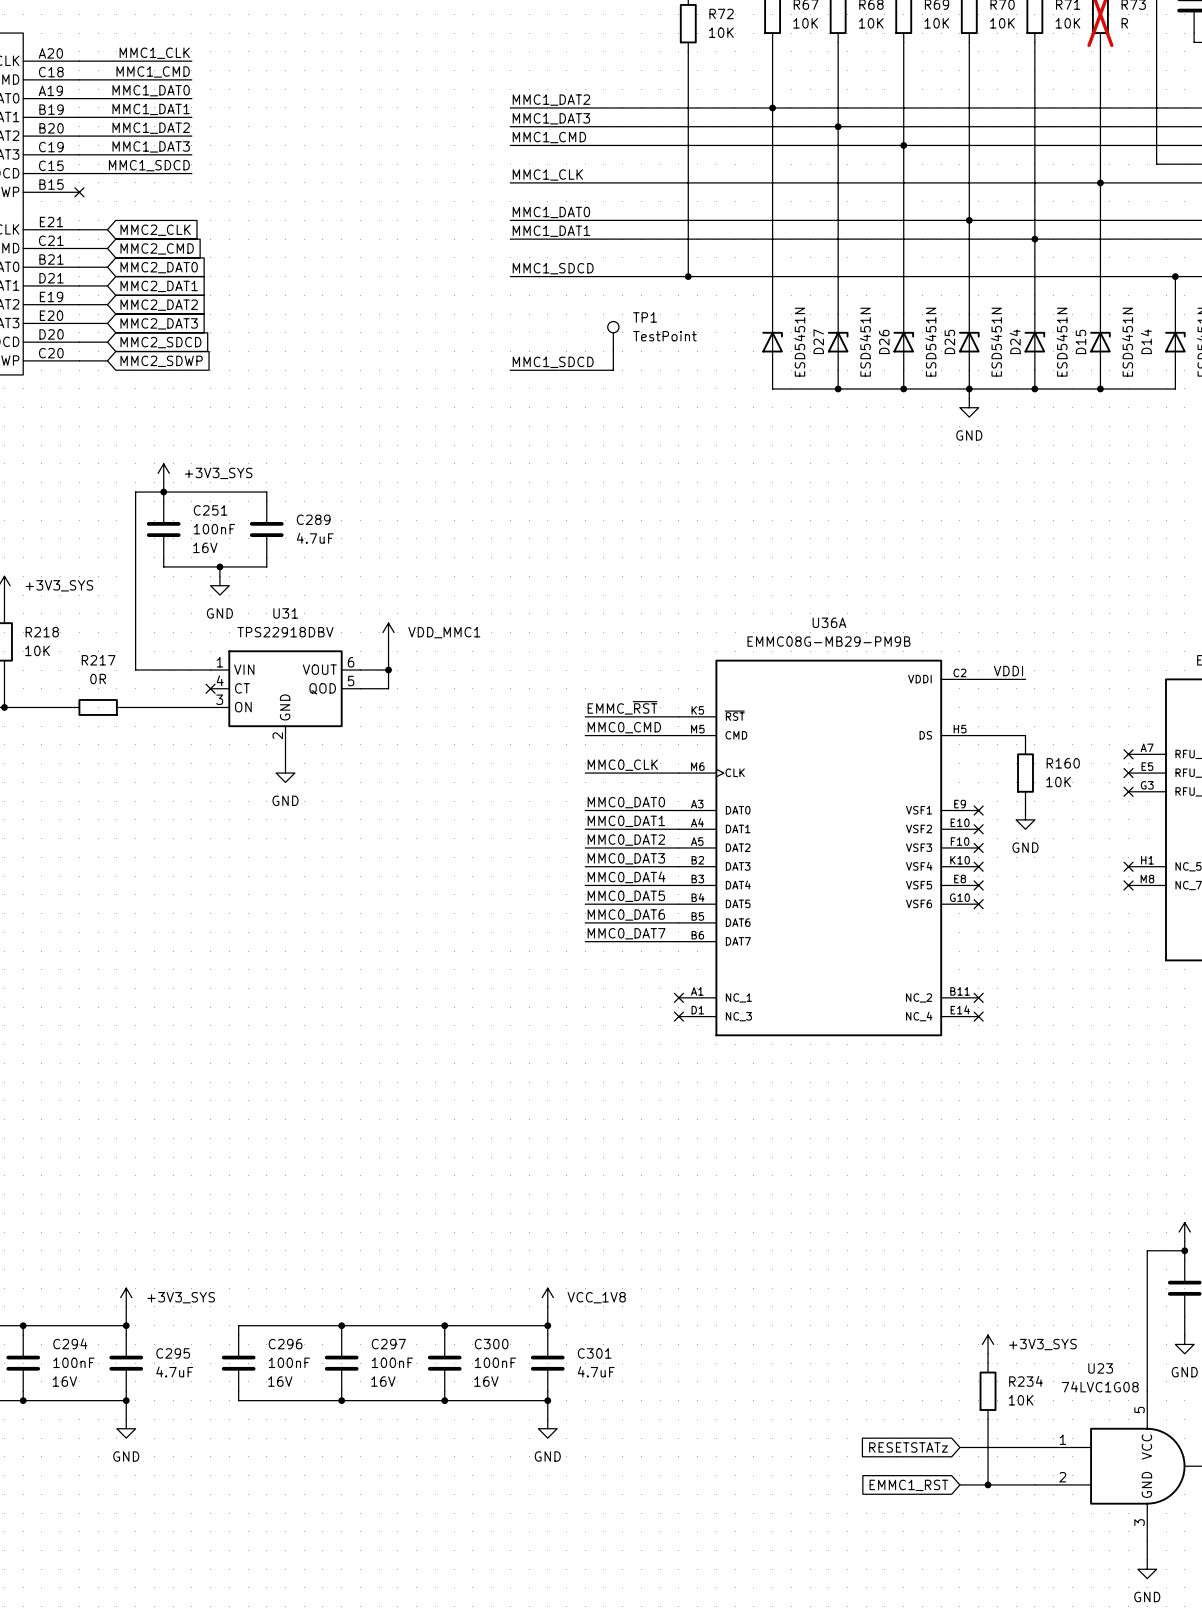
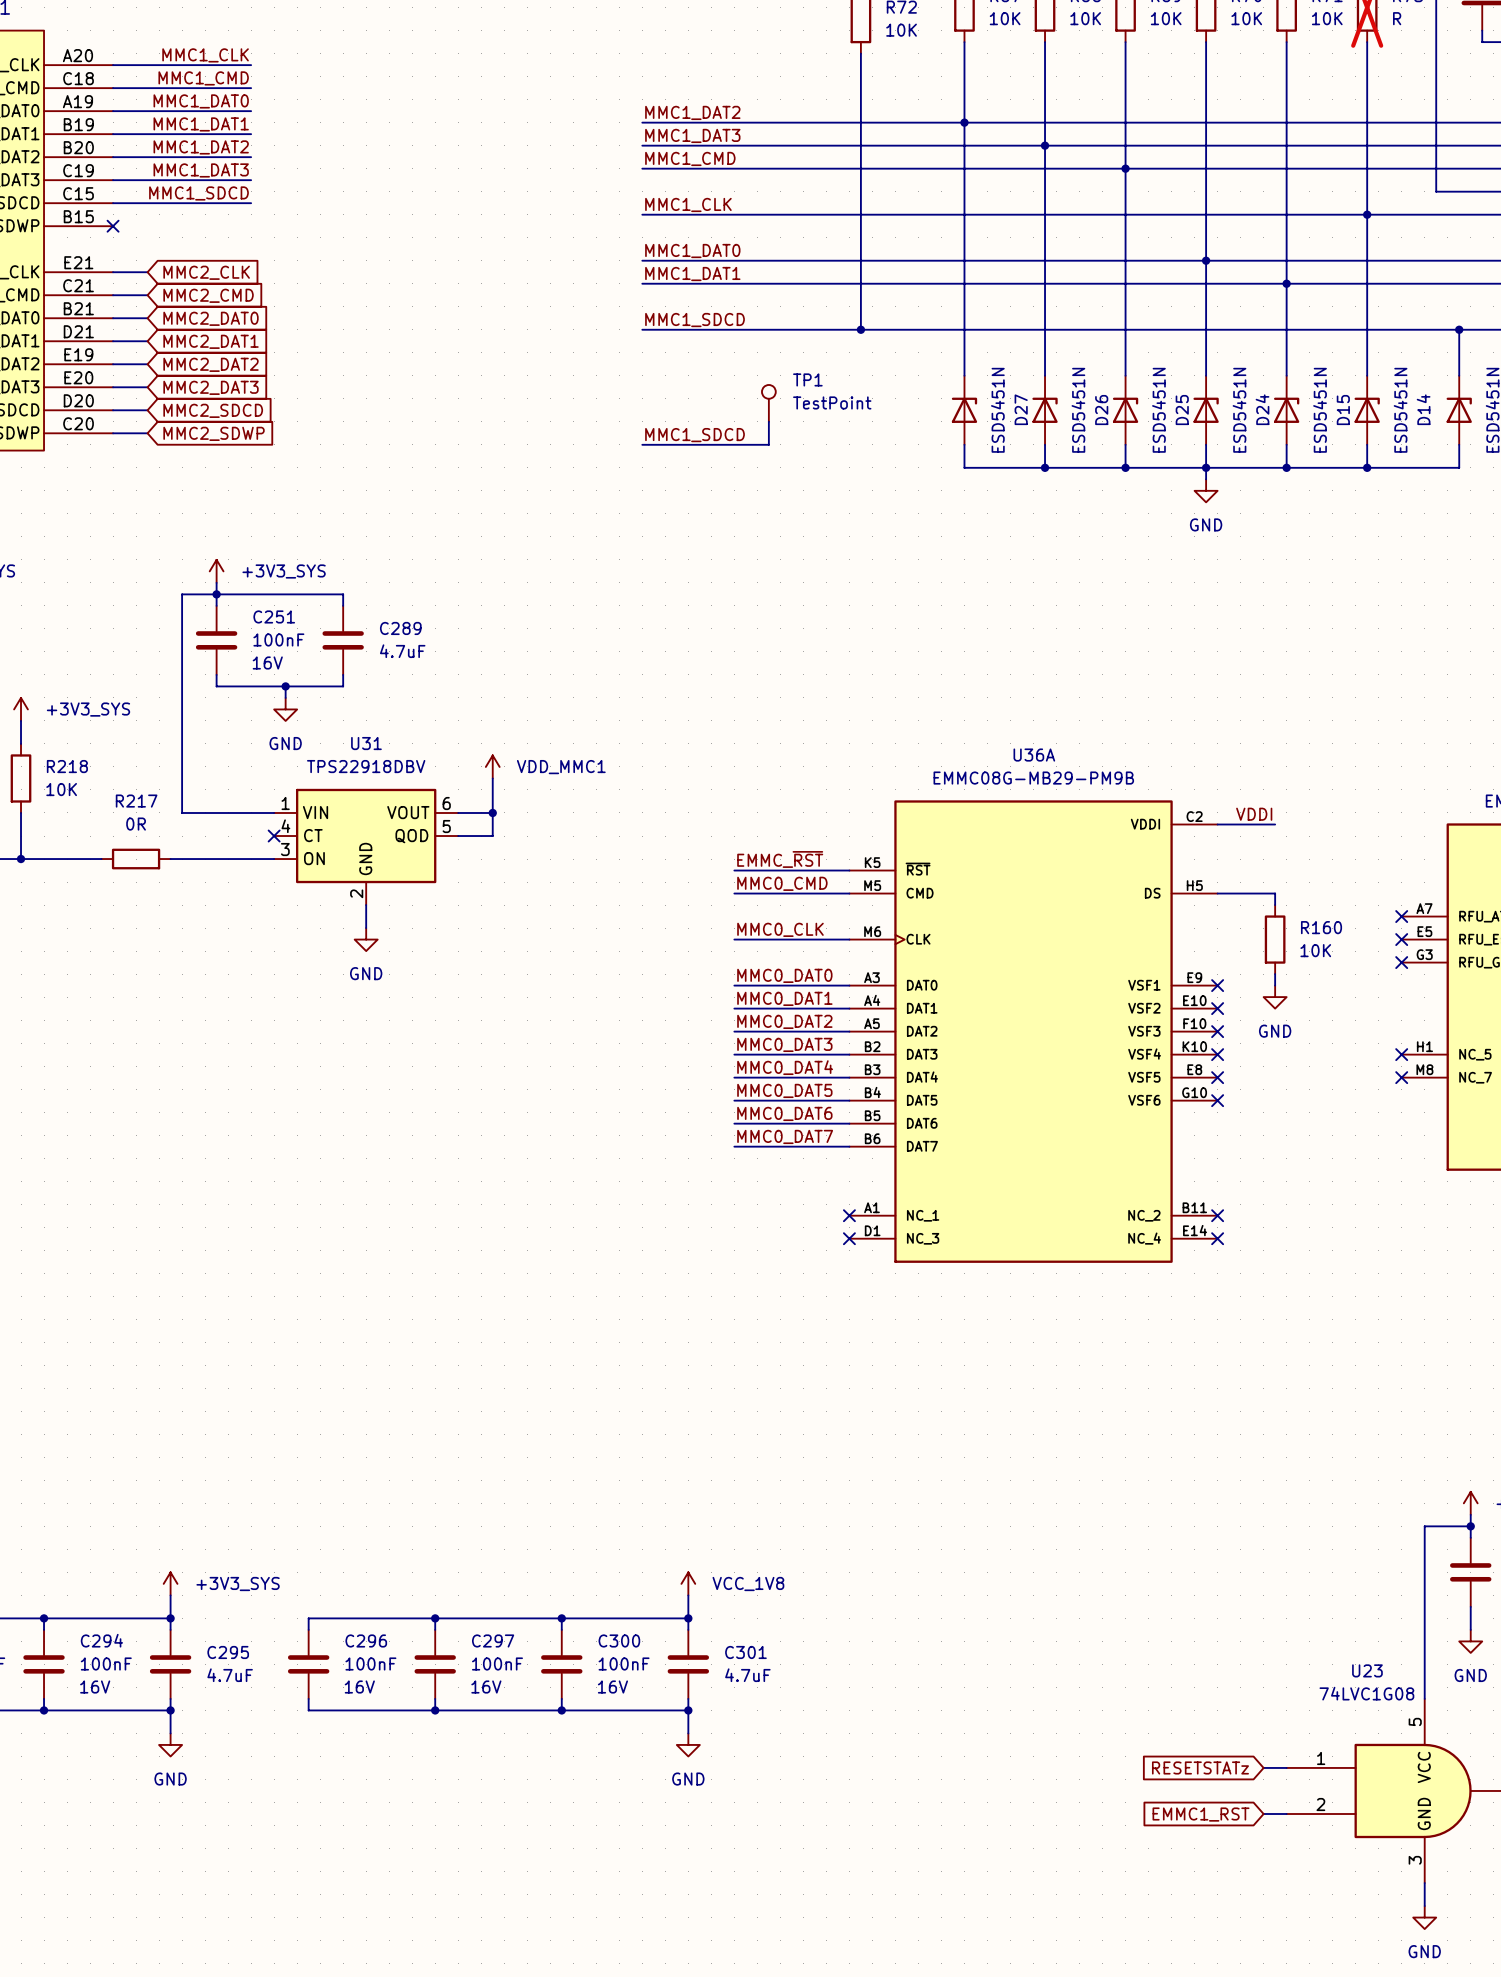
power symbol: +3V3_SYS (988, 1344) -> none
wire: (988, 1353) (988, 1363) -> none
R234: 10K (988, 1391) -> none
wire: (988, 1419) (988, 1484) -> none
global label position: RESETSTATz (908, 1447) -> RESETSTATz (1200, 1767)
wire: (959, 1447) (1016, 1447) -> none
wire: (959, 1484) (1016, 1484) -> none
junction: (988, 1484) -> none
global label position: EMMC1_RST (908, 1485) -> EMMC1_RST (1201, 1814)

